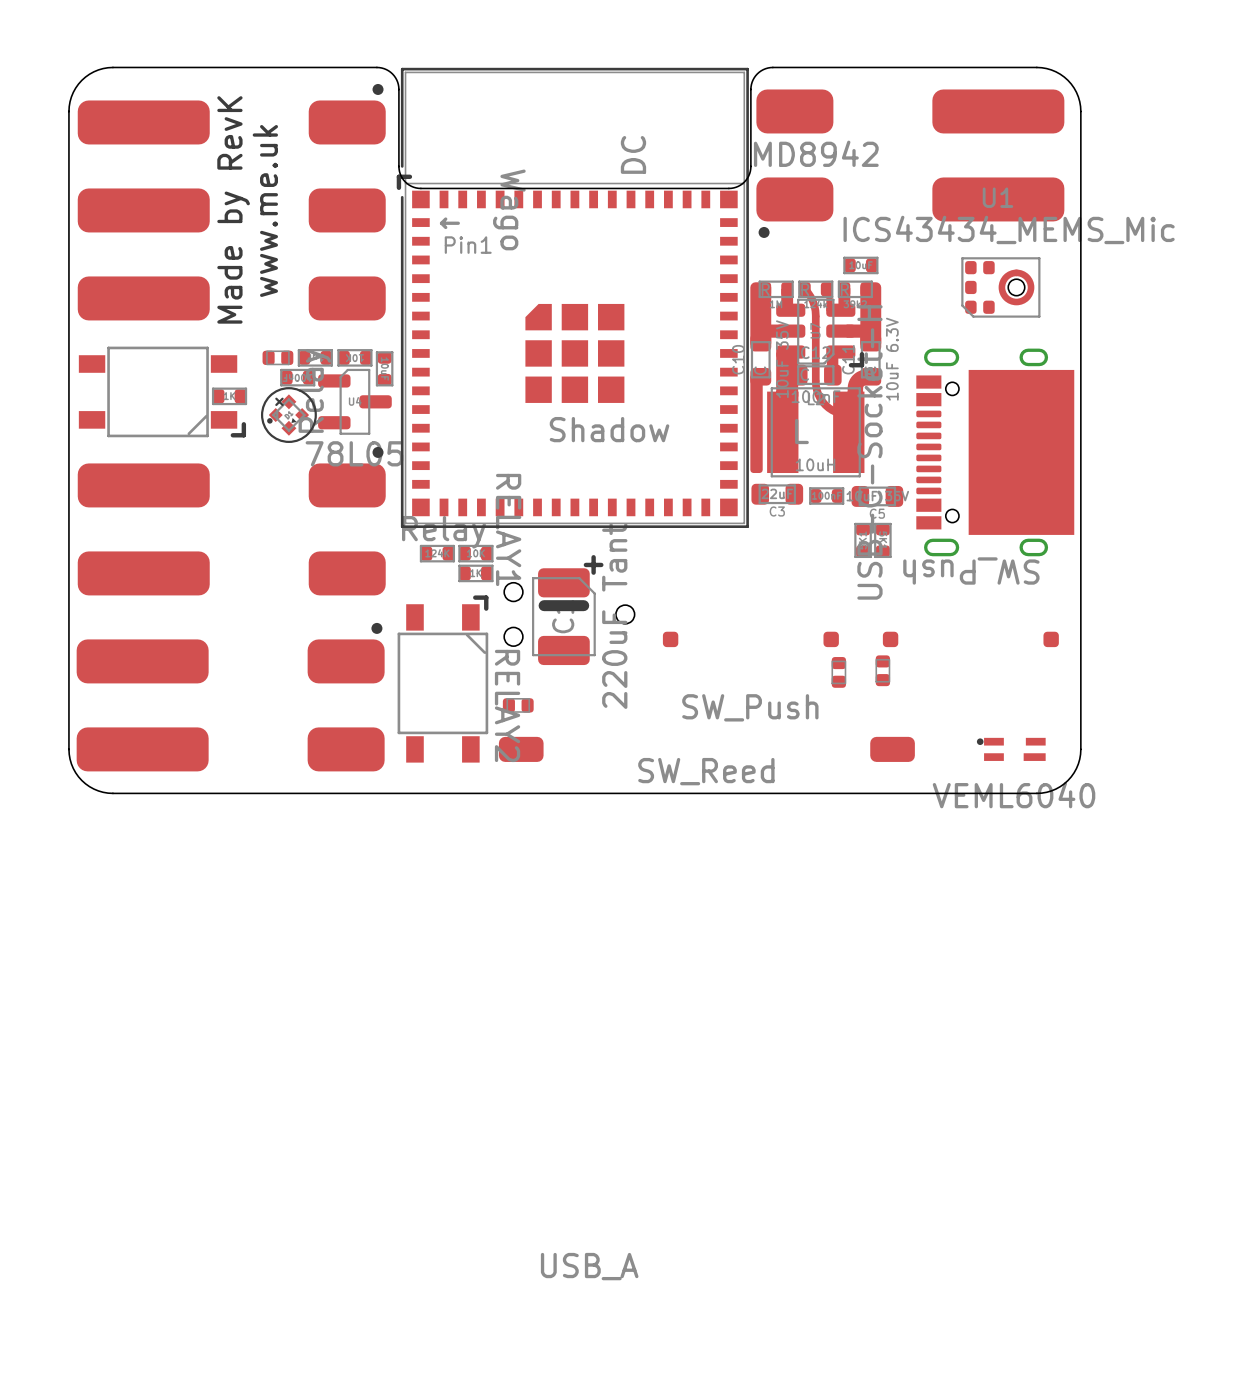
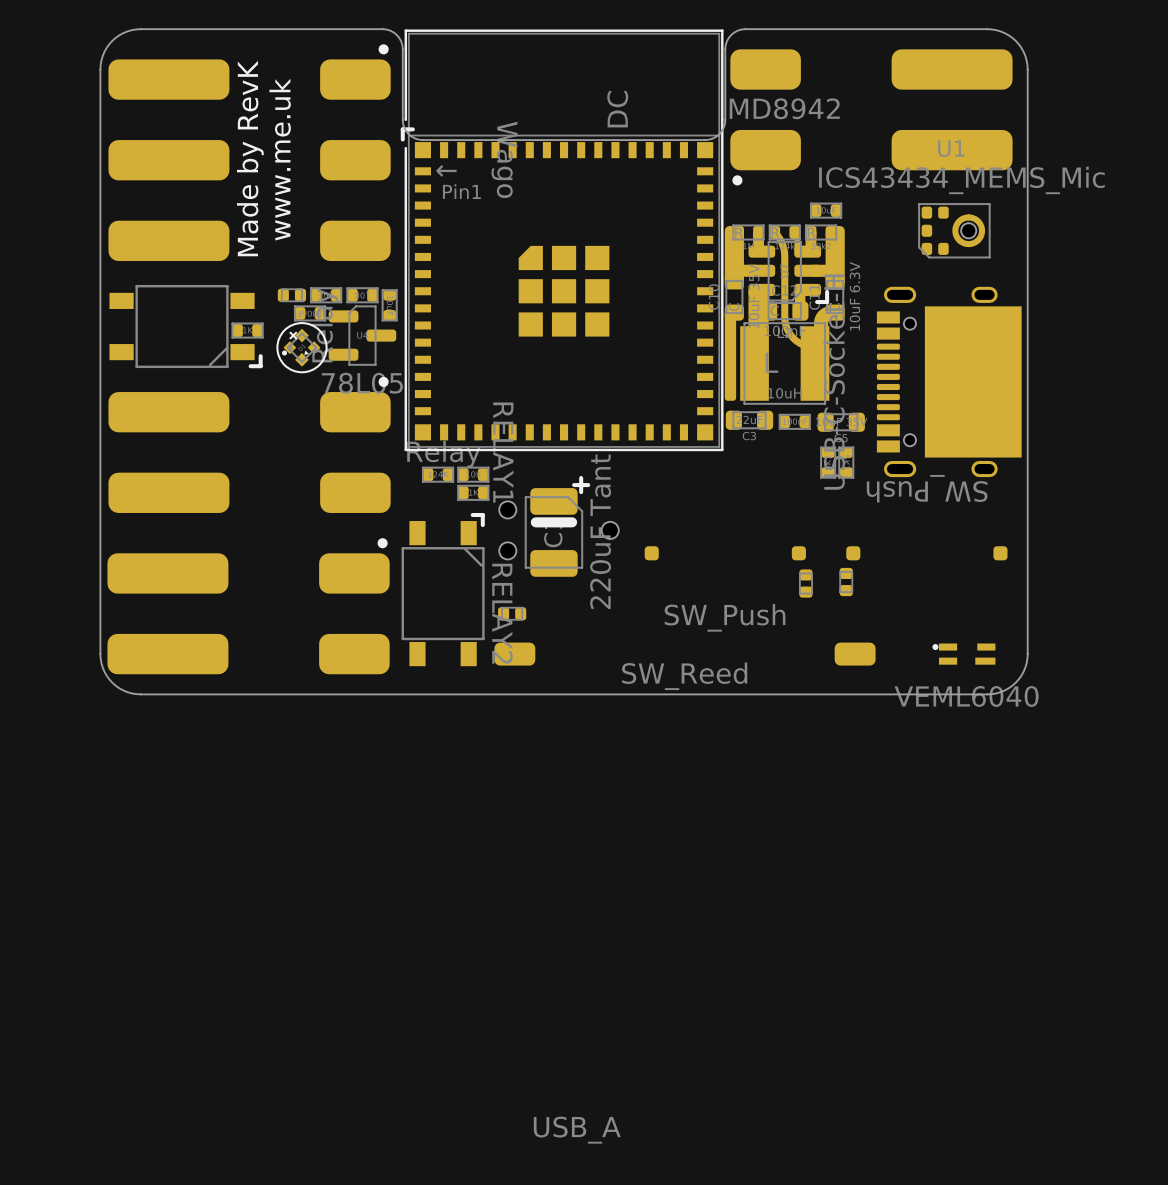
drawing: [549, 416, 670, 443] -> none

